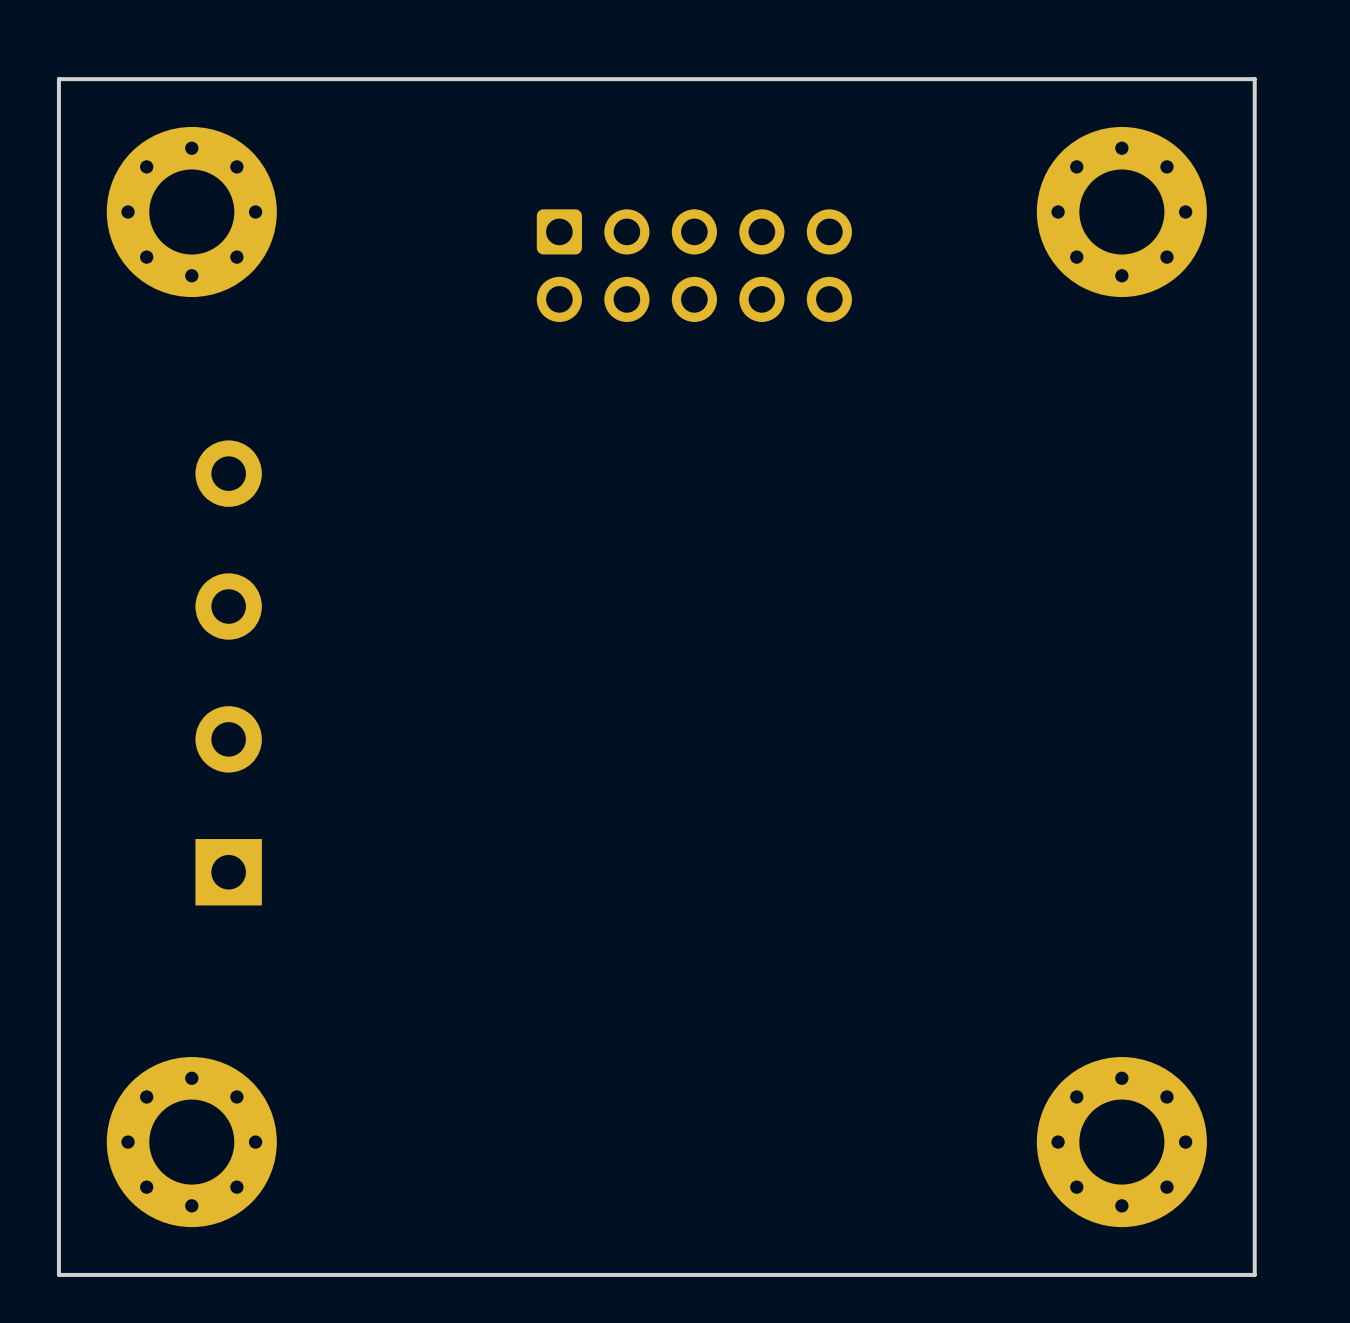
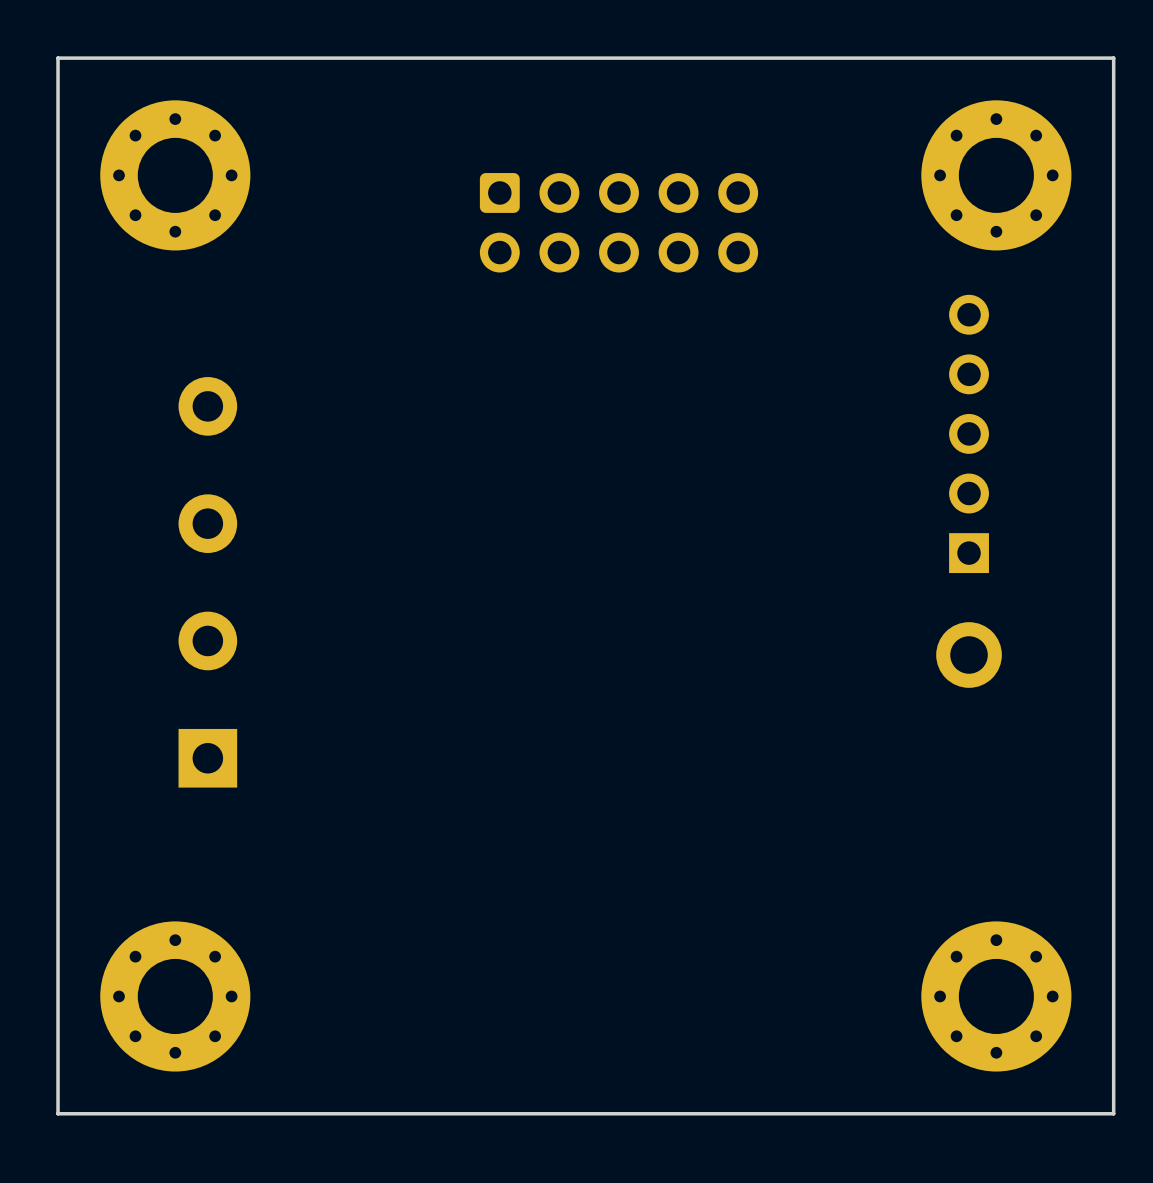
part: none -> (969, 433)
part: none -> (969, 655)

